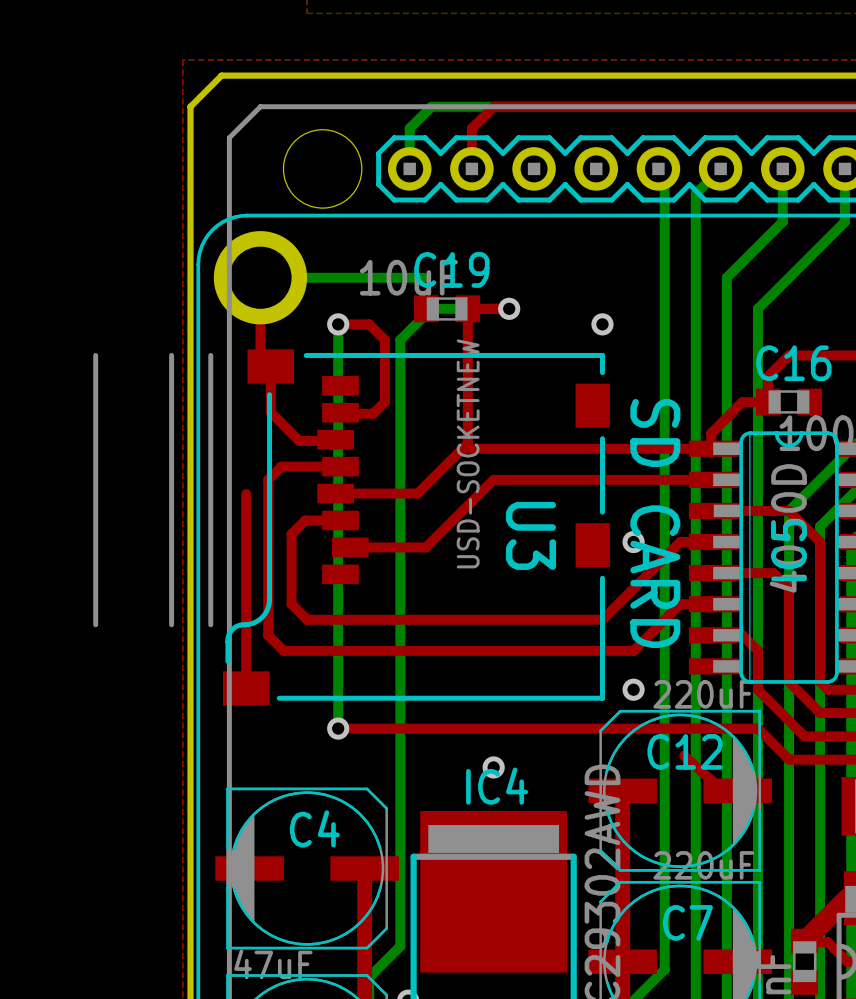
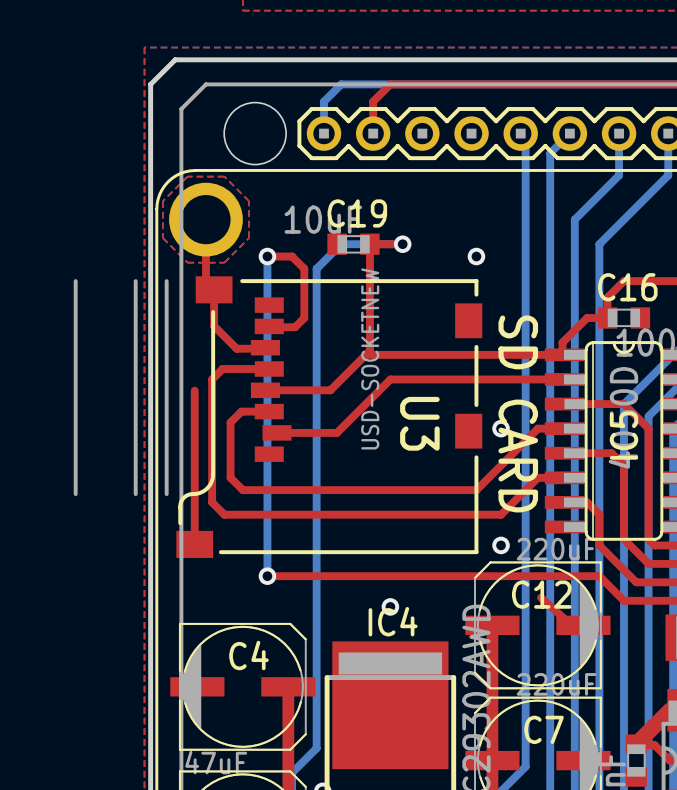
top zone outline: none -> (187, 176) (162, 201) (162, 238) (187, 262) (224, 262) (249, 238) (249, 201) (224, 176) (187, 176)
bottom track: (260, 277) (423, 277) -> none

